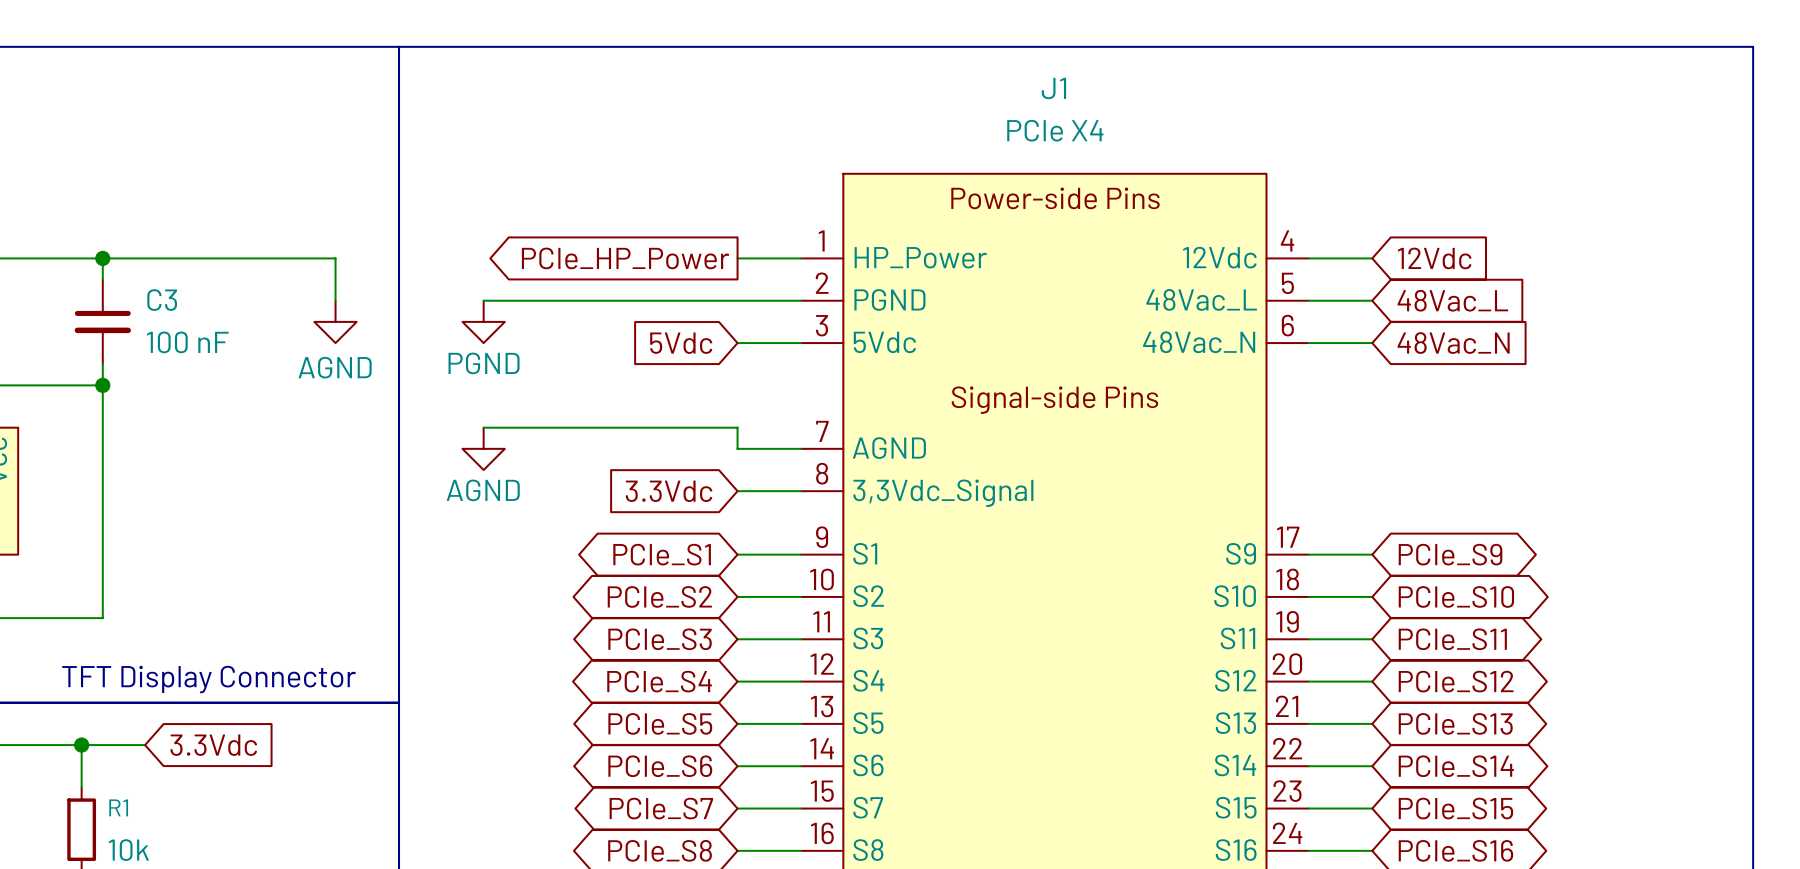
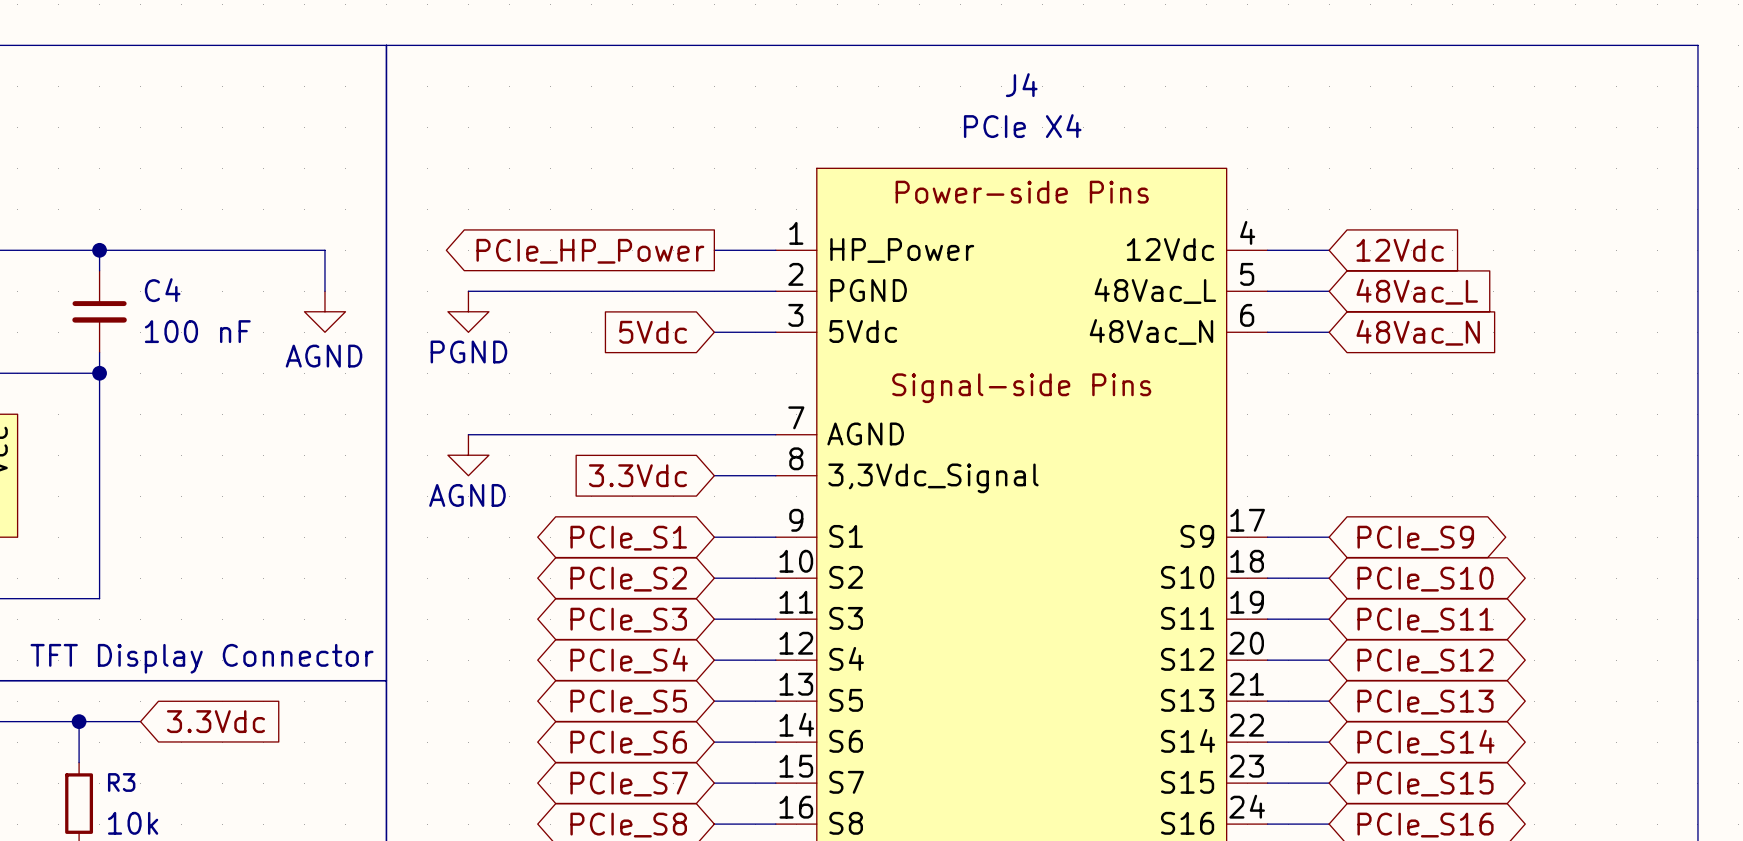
J1 name: J1 (1053, 88) -> J4 (1021, 85)
C3 name: C3 (162, 300) -> C4 (162, 290)
wire: (483, 427) (737, 427) (737, 448) -> (468, 434) (714, 434)
power symbol position: AGND (483, 448) -> AGND (468, 455)
R1 name: R1 (118, 807) -> R3 (121, 782)

